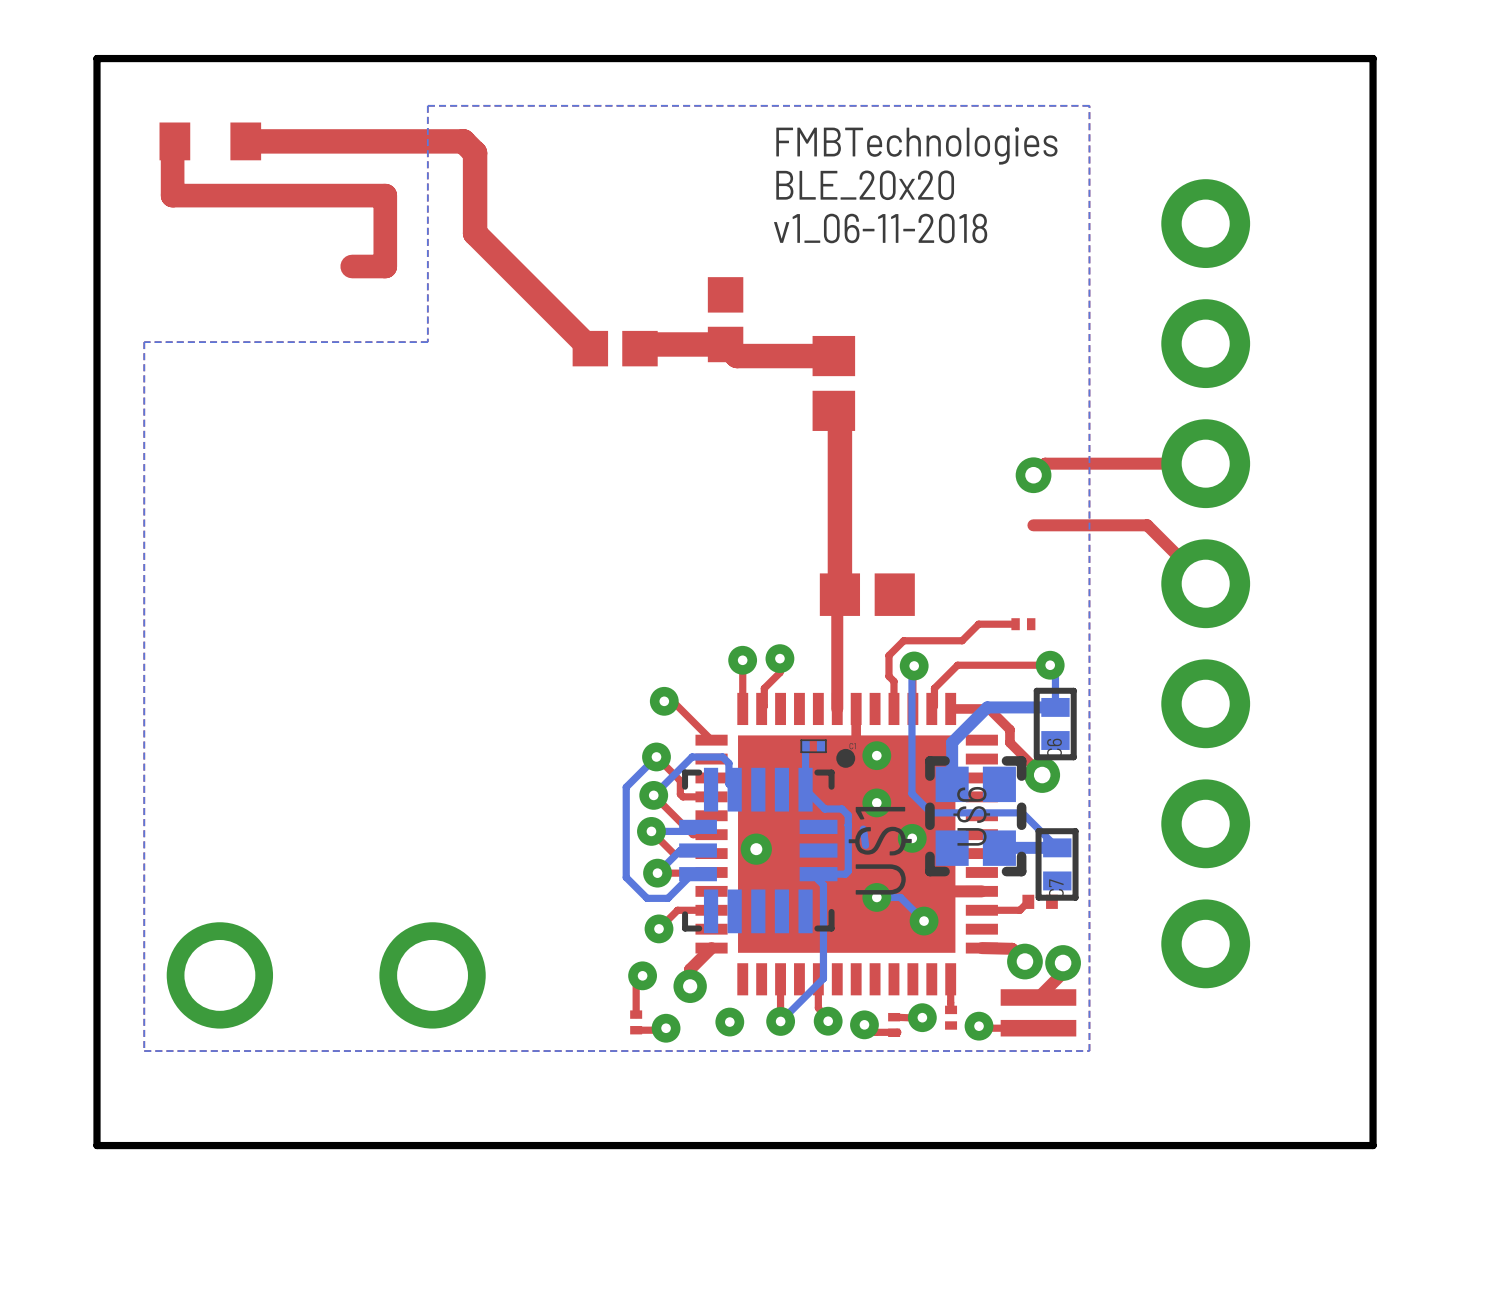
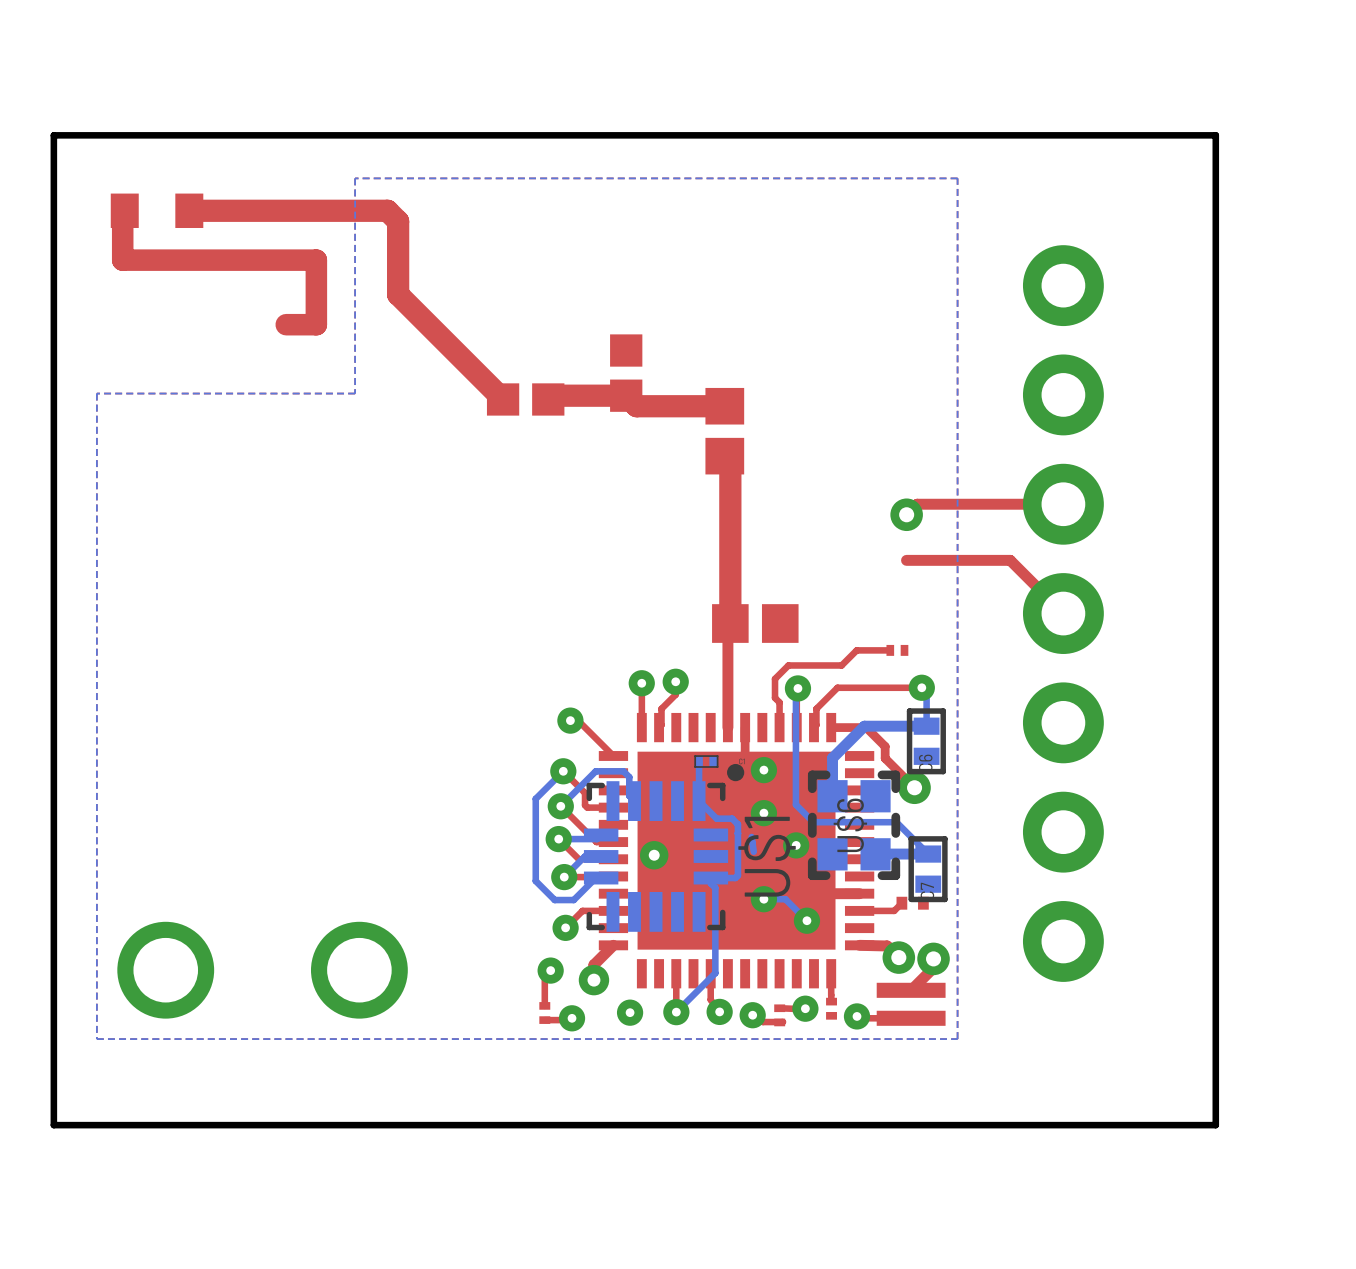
text: FMBTechnologies (916, 145) -> none
text: BLE_20x20 (865, 185) -> none
text: v1_06-11-2018 (880, 228) -> none

